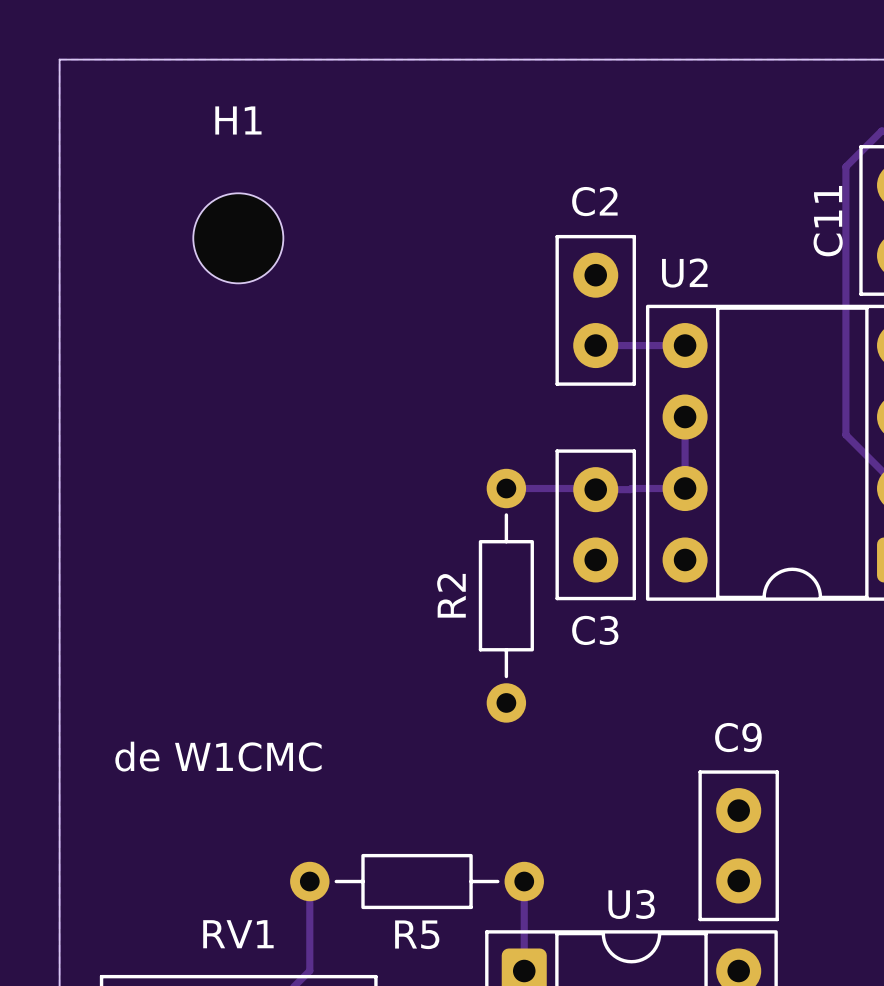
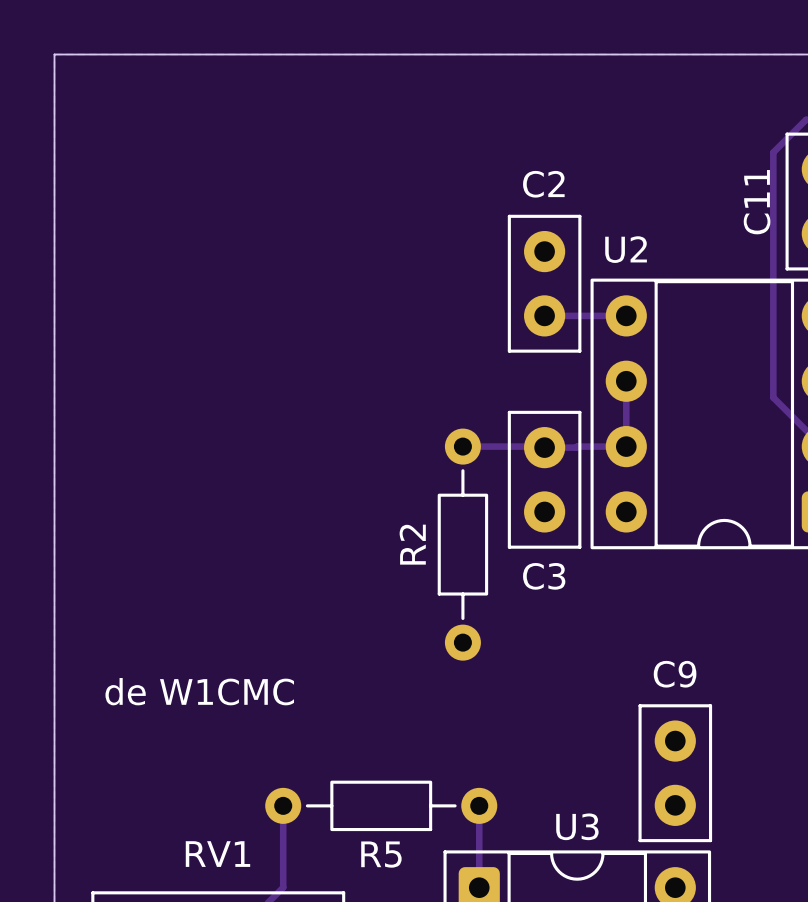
H1: (238, 238) -> none

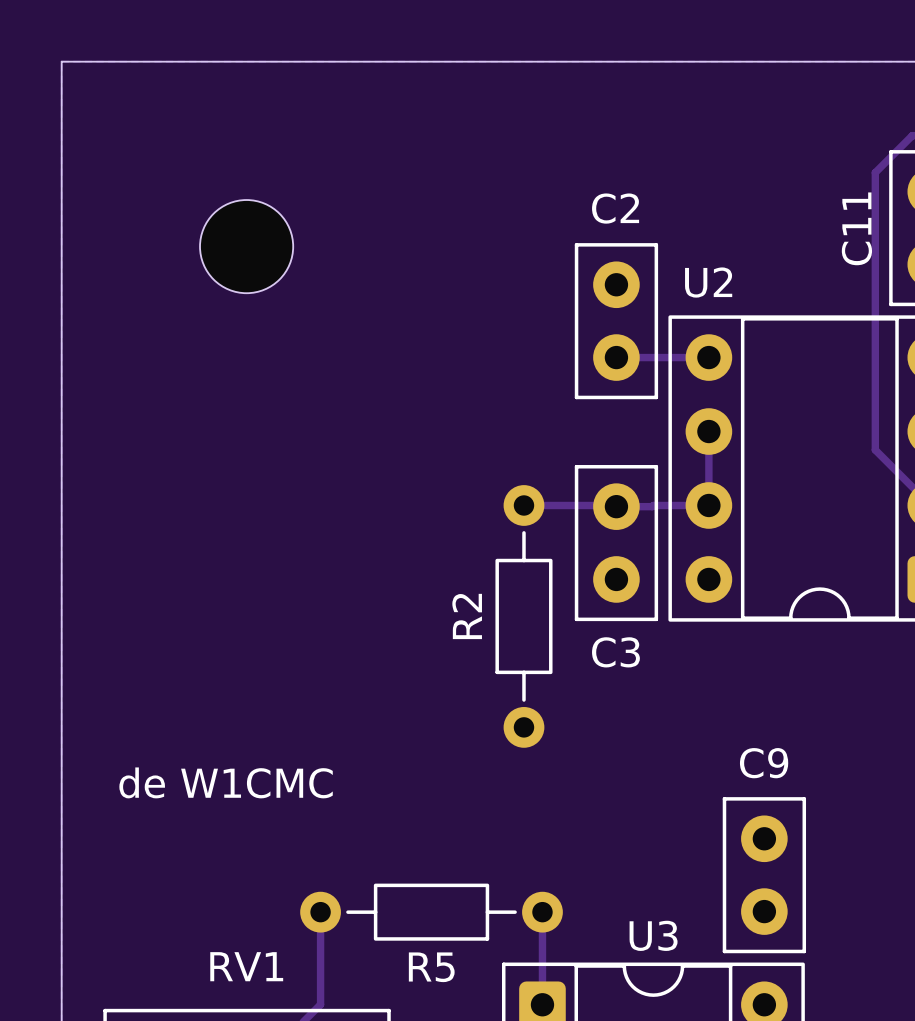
part: none -> (246, 246)

